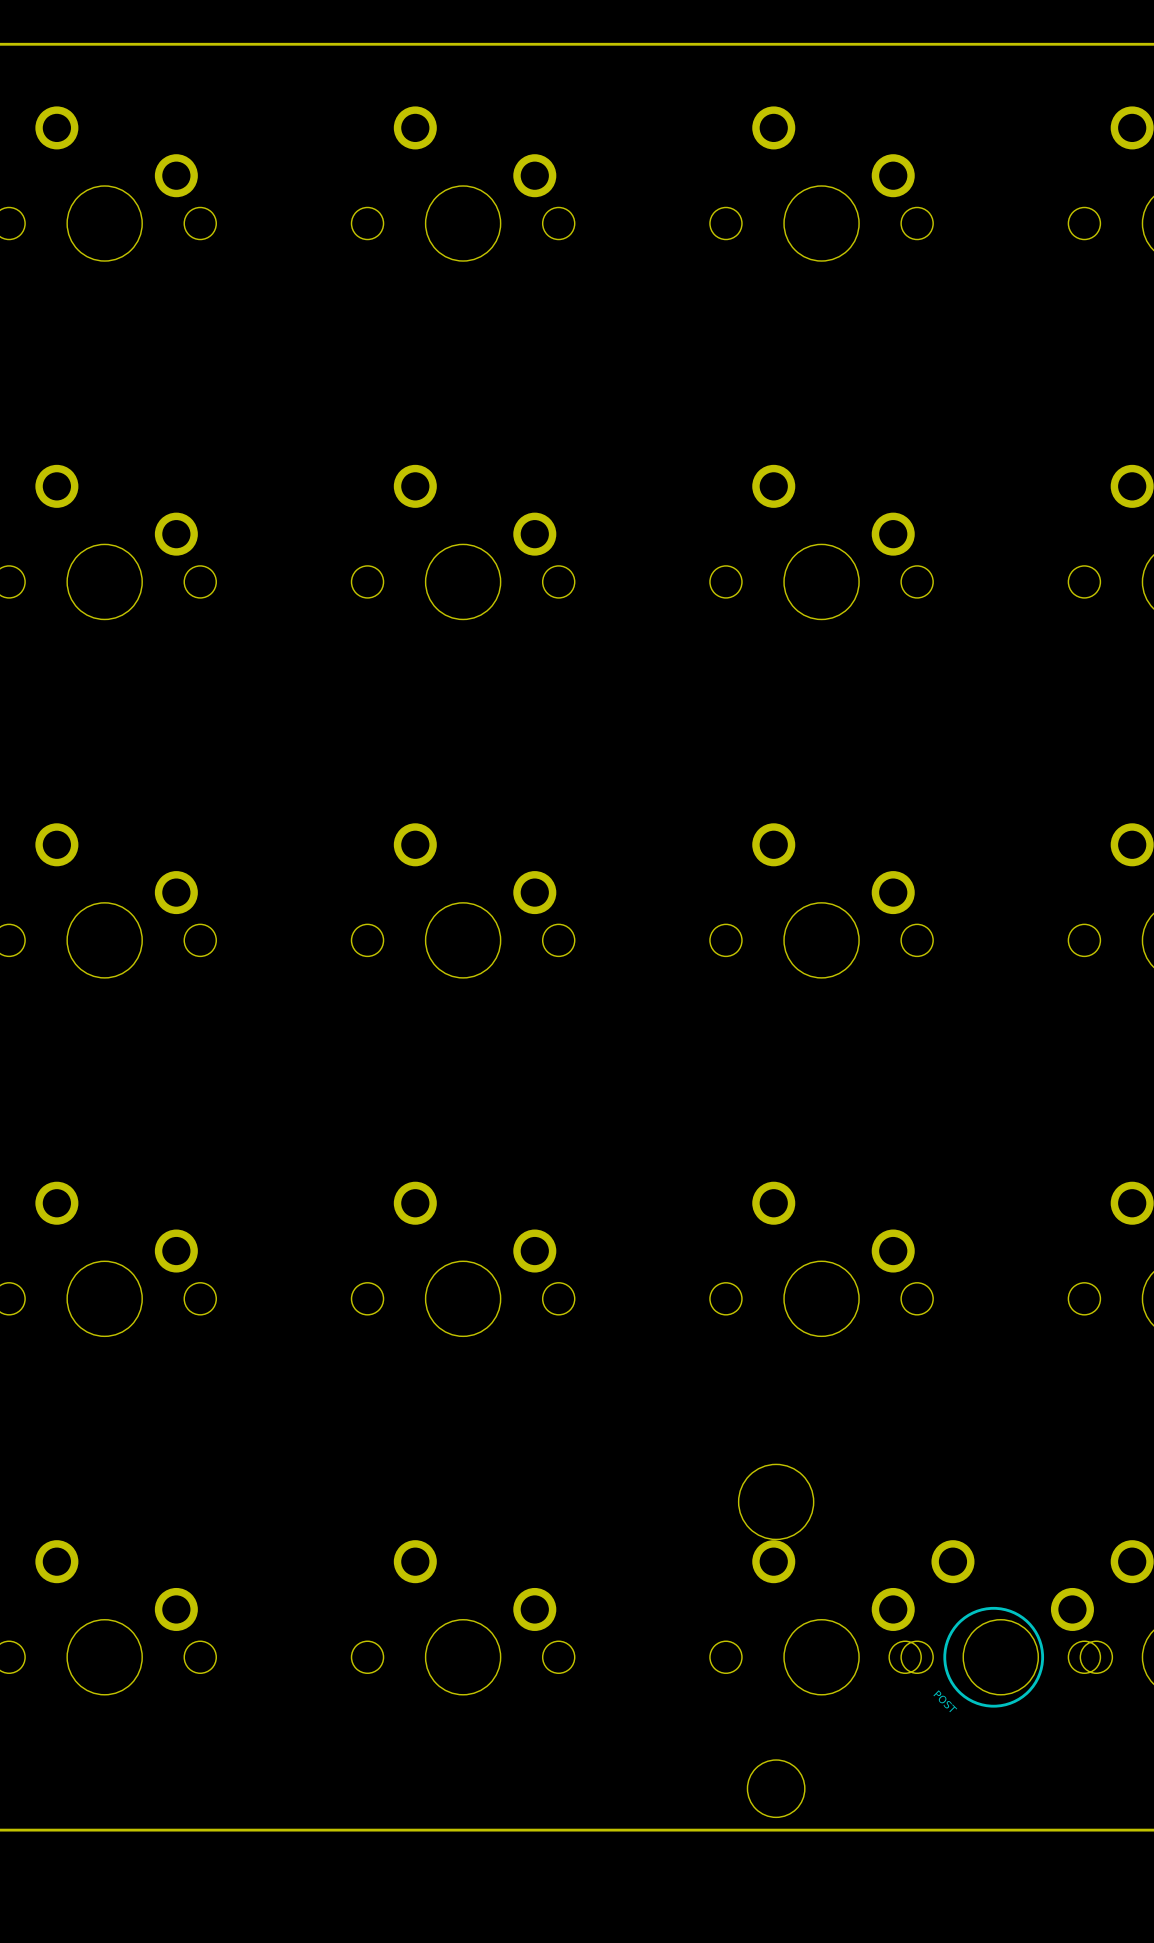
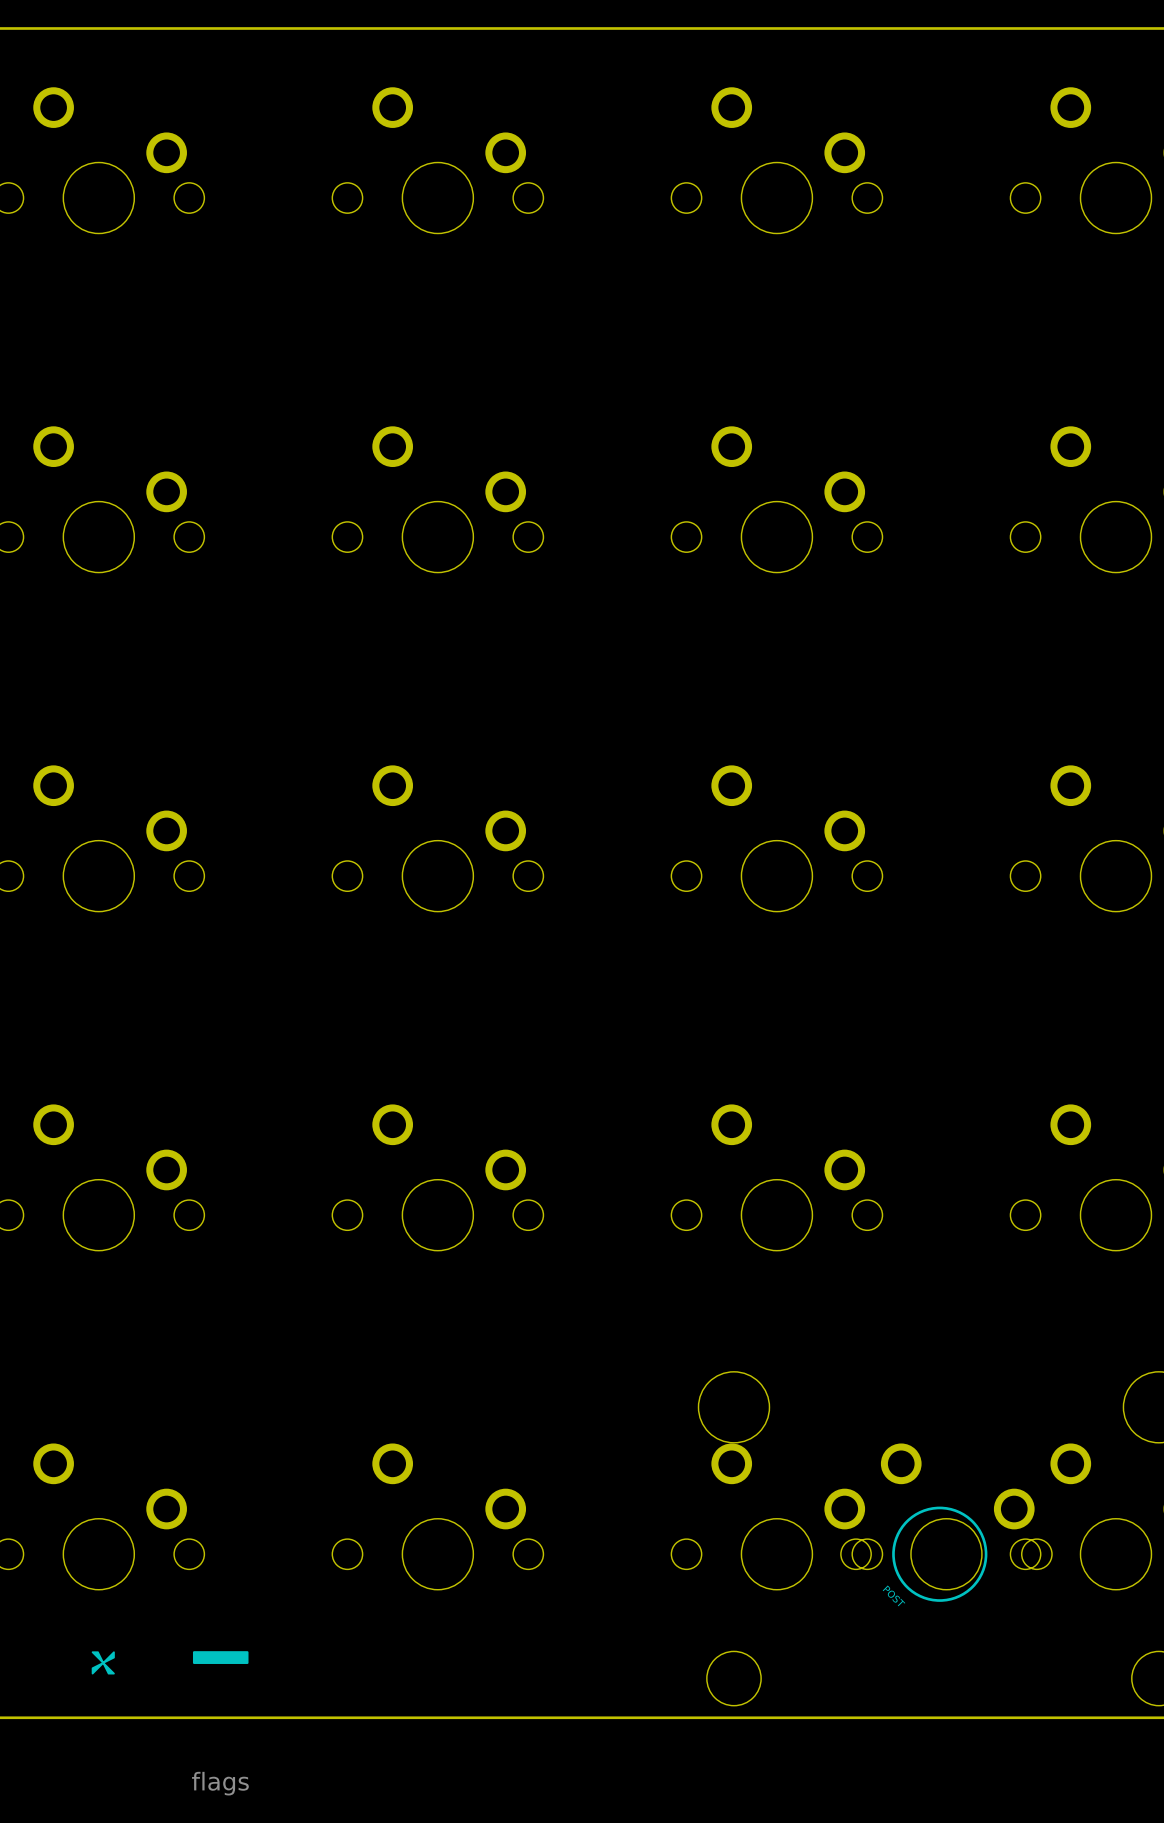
drawing: none -> [91, 1651, 249, 1675]

